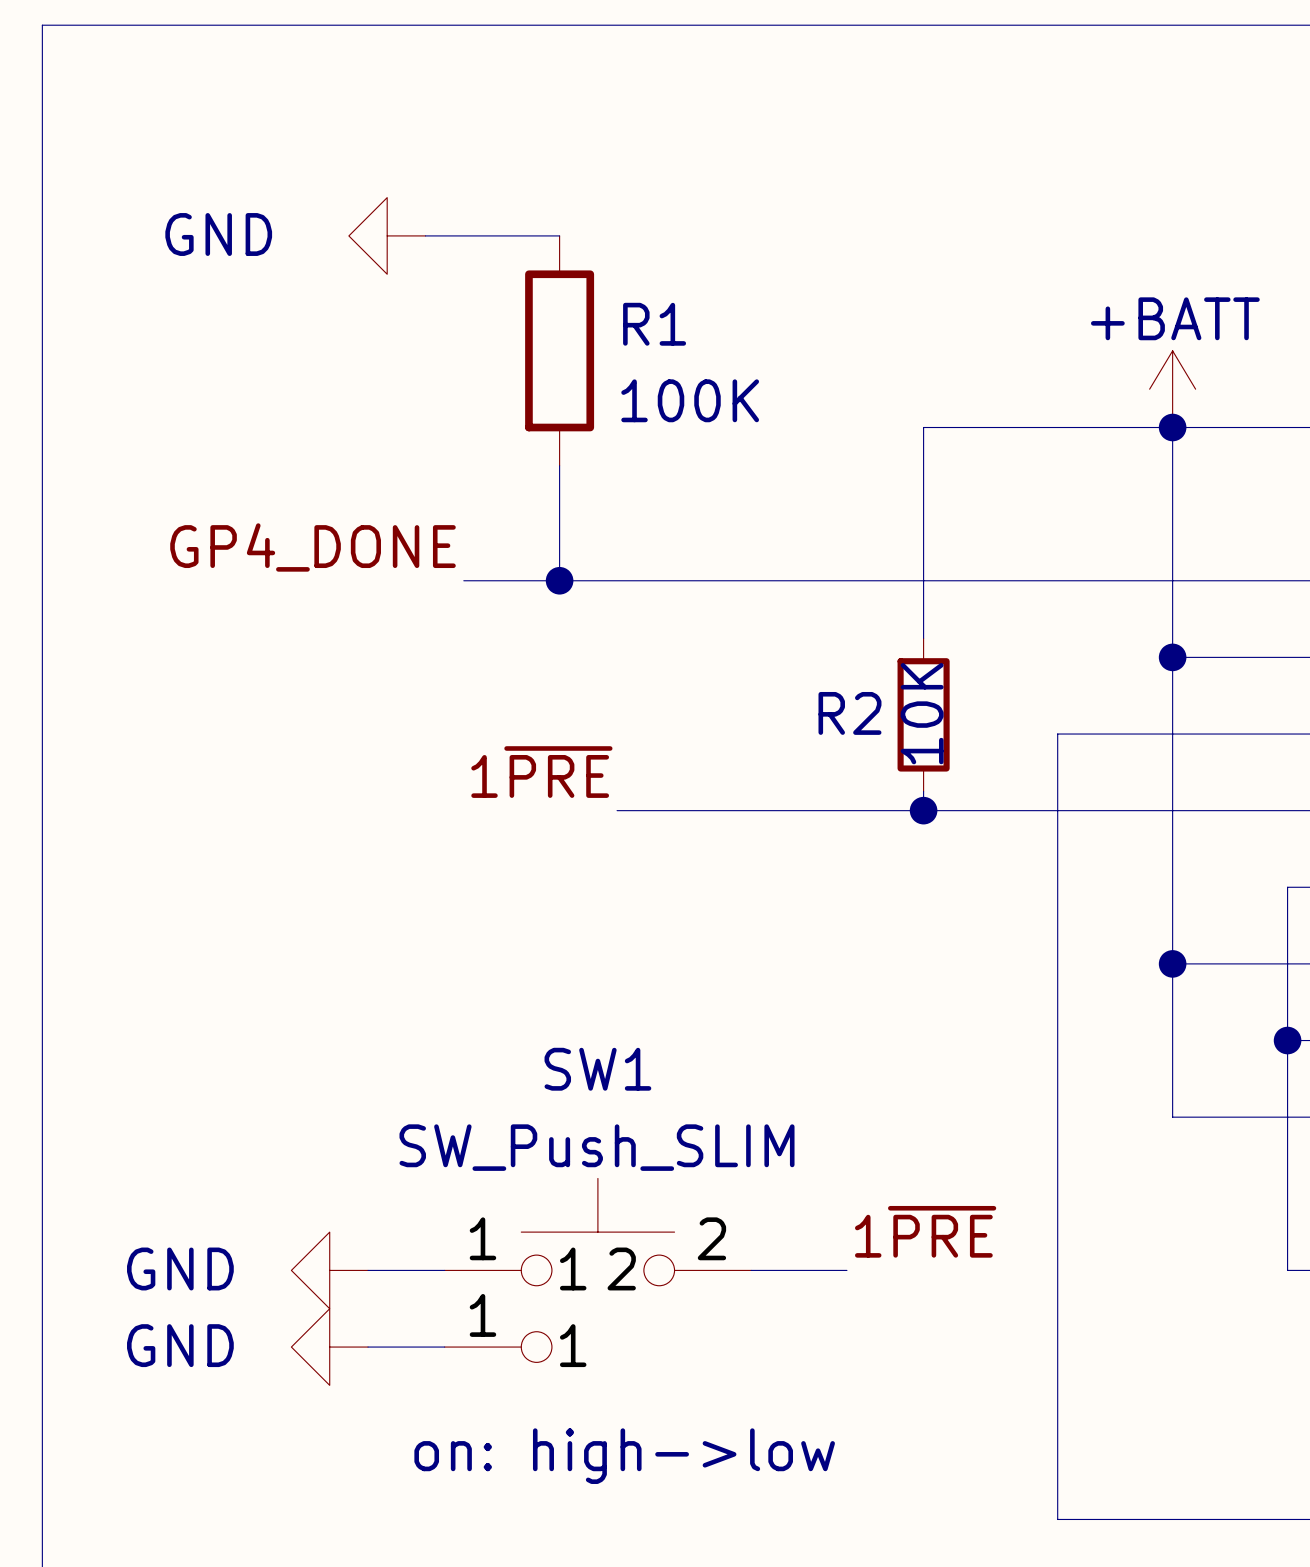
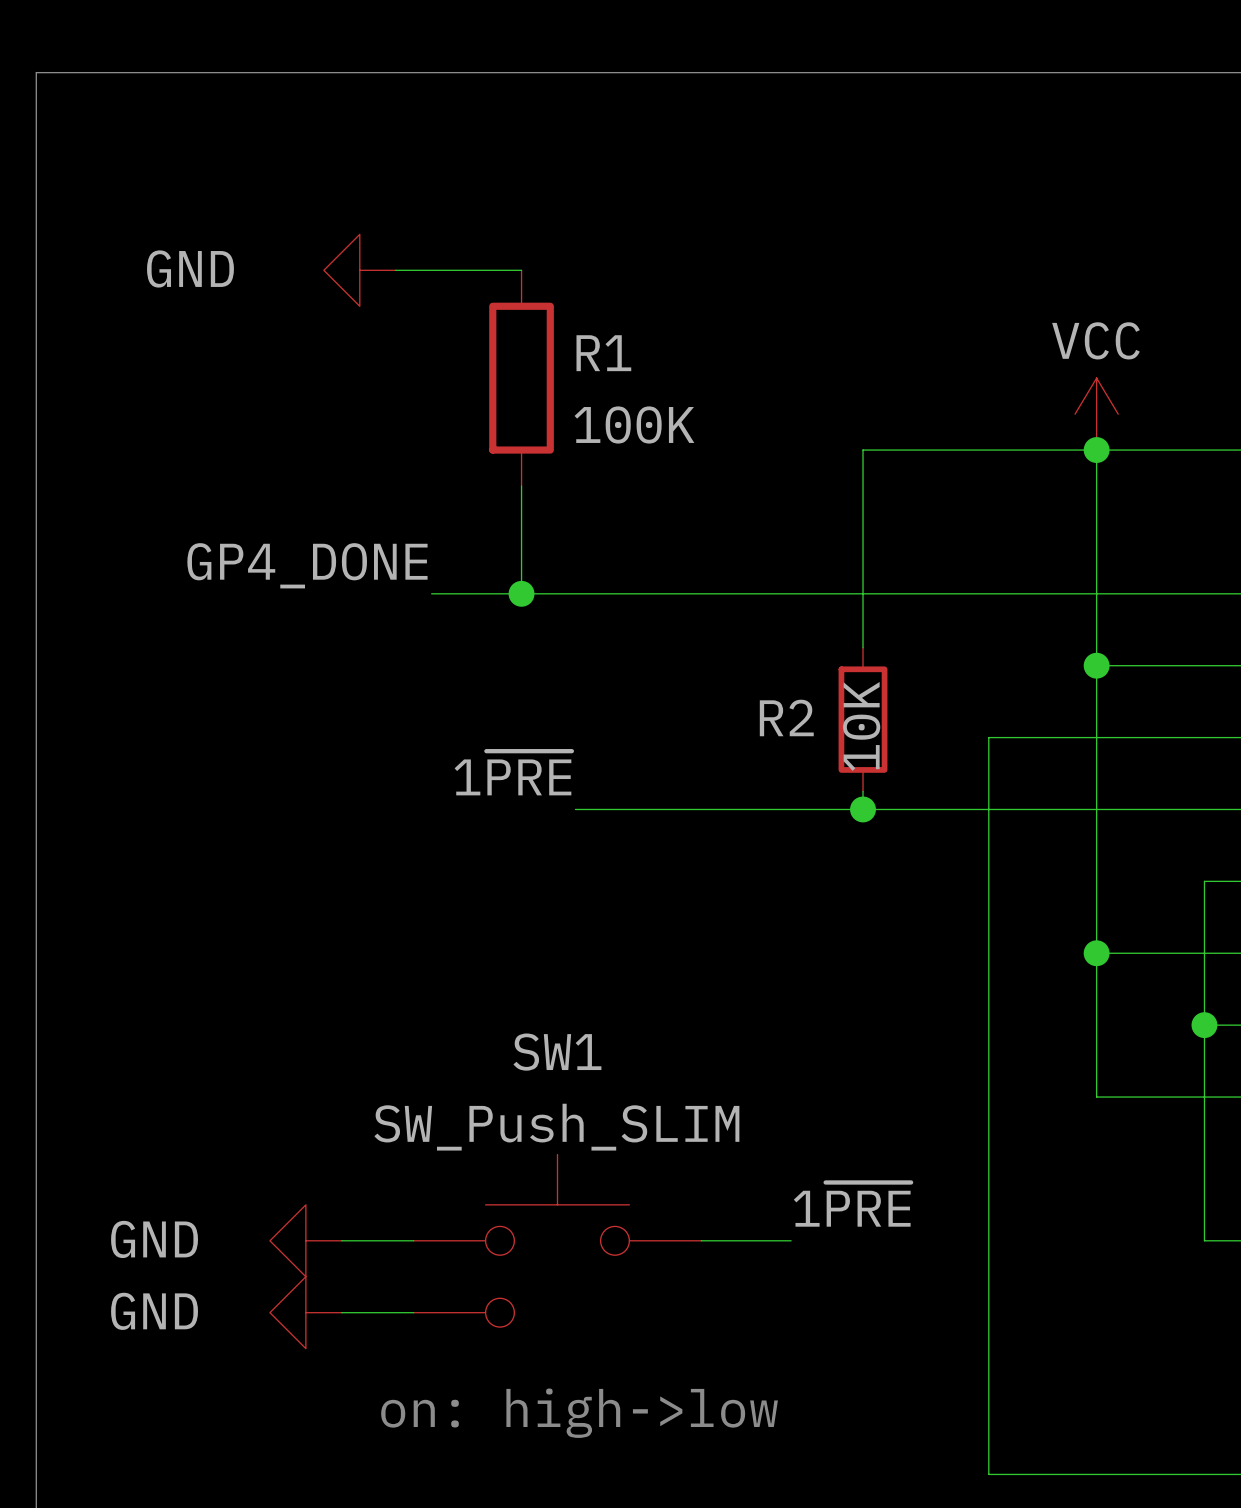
power symbol: +BATT (1172, 389) -> VCC (1096, 414)
SW1 pin number: 1 (482, 1238) -> none
SW1 pin number: 2 (711, 1238) -> none
SW1 pin name: 1 (573, 1268) -> none
SW1 pin name: 2 (621, 1268) -> none
SW1 pin number: 1 (482, 1315) -> none
SW1 pin name: 1 (573, 1345) -> none

